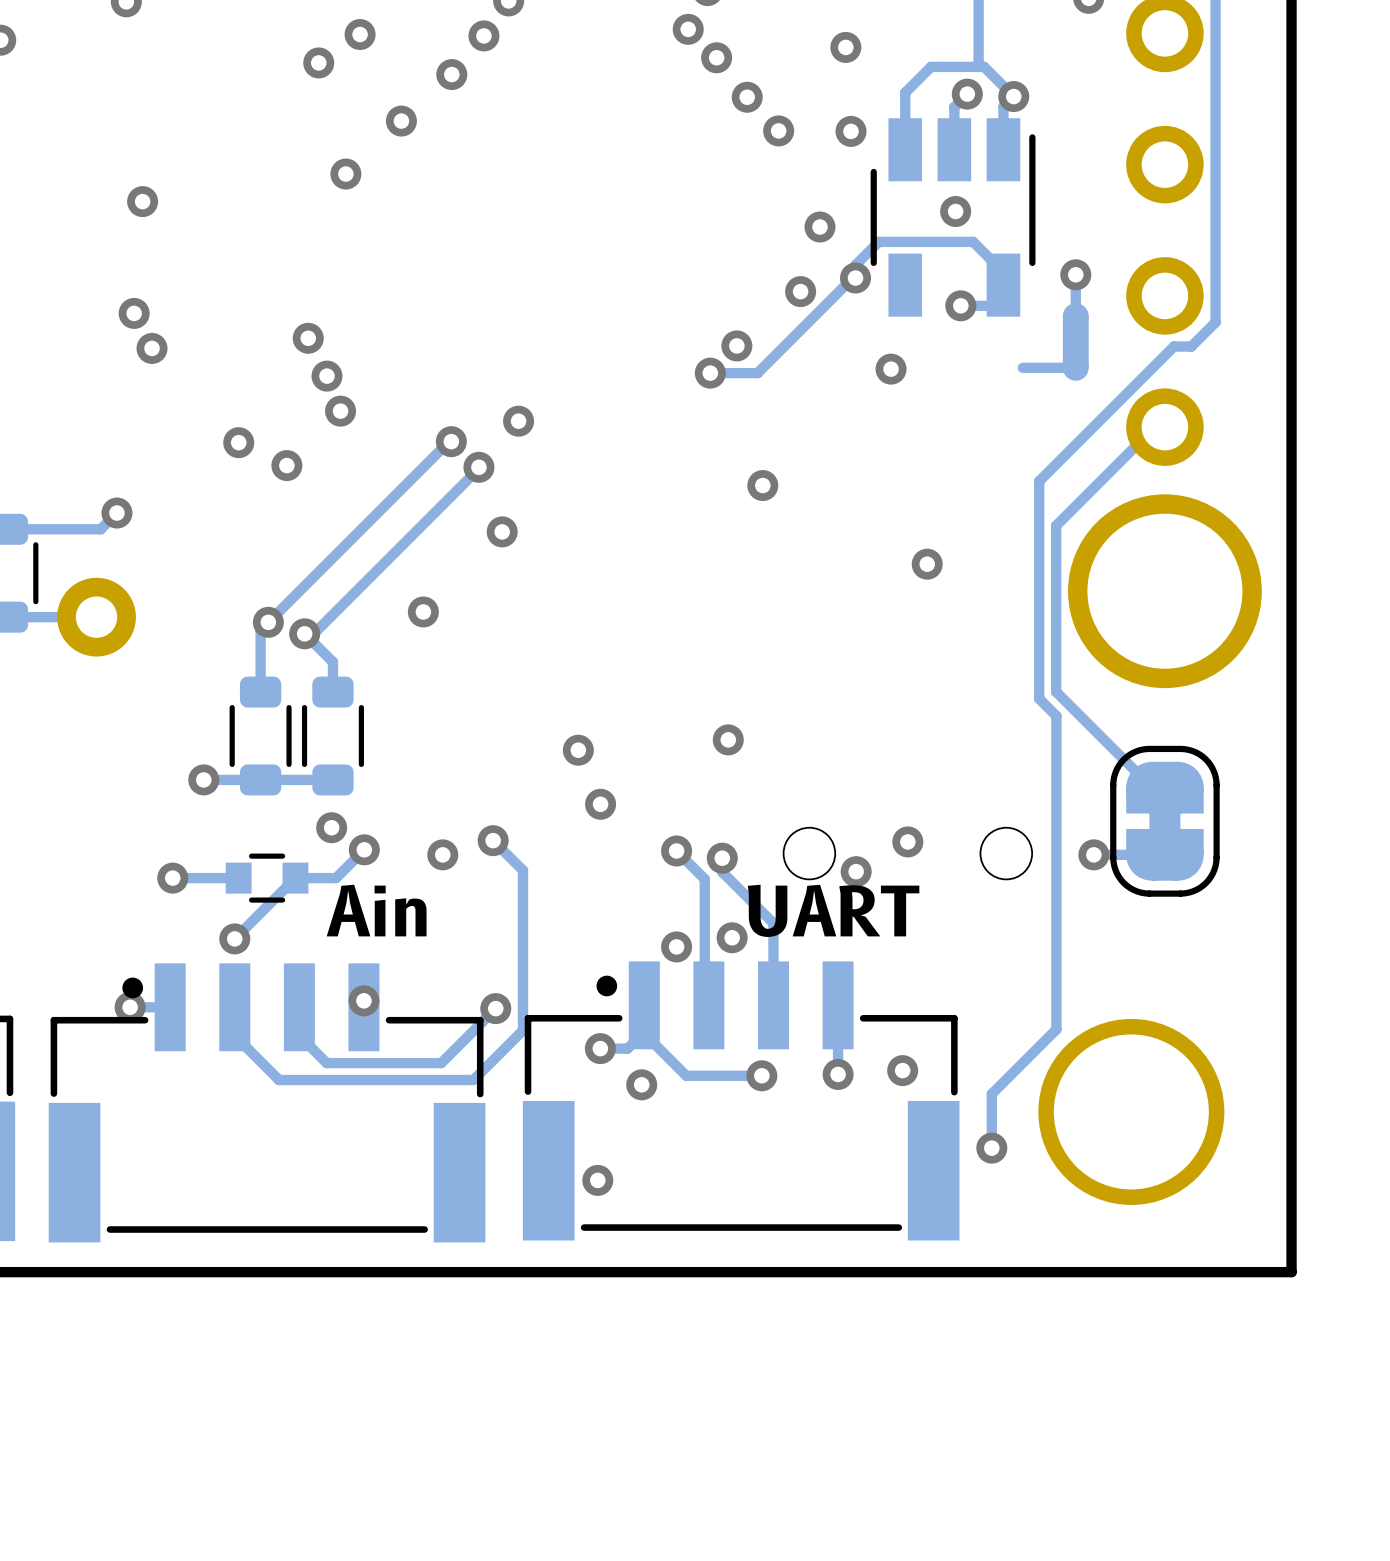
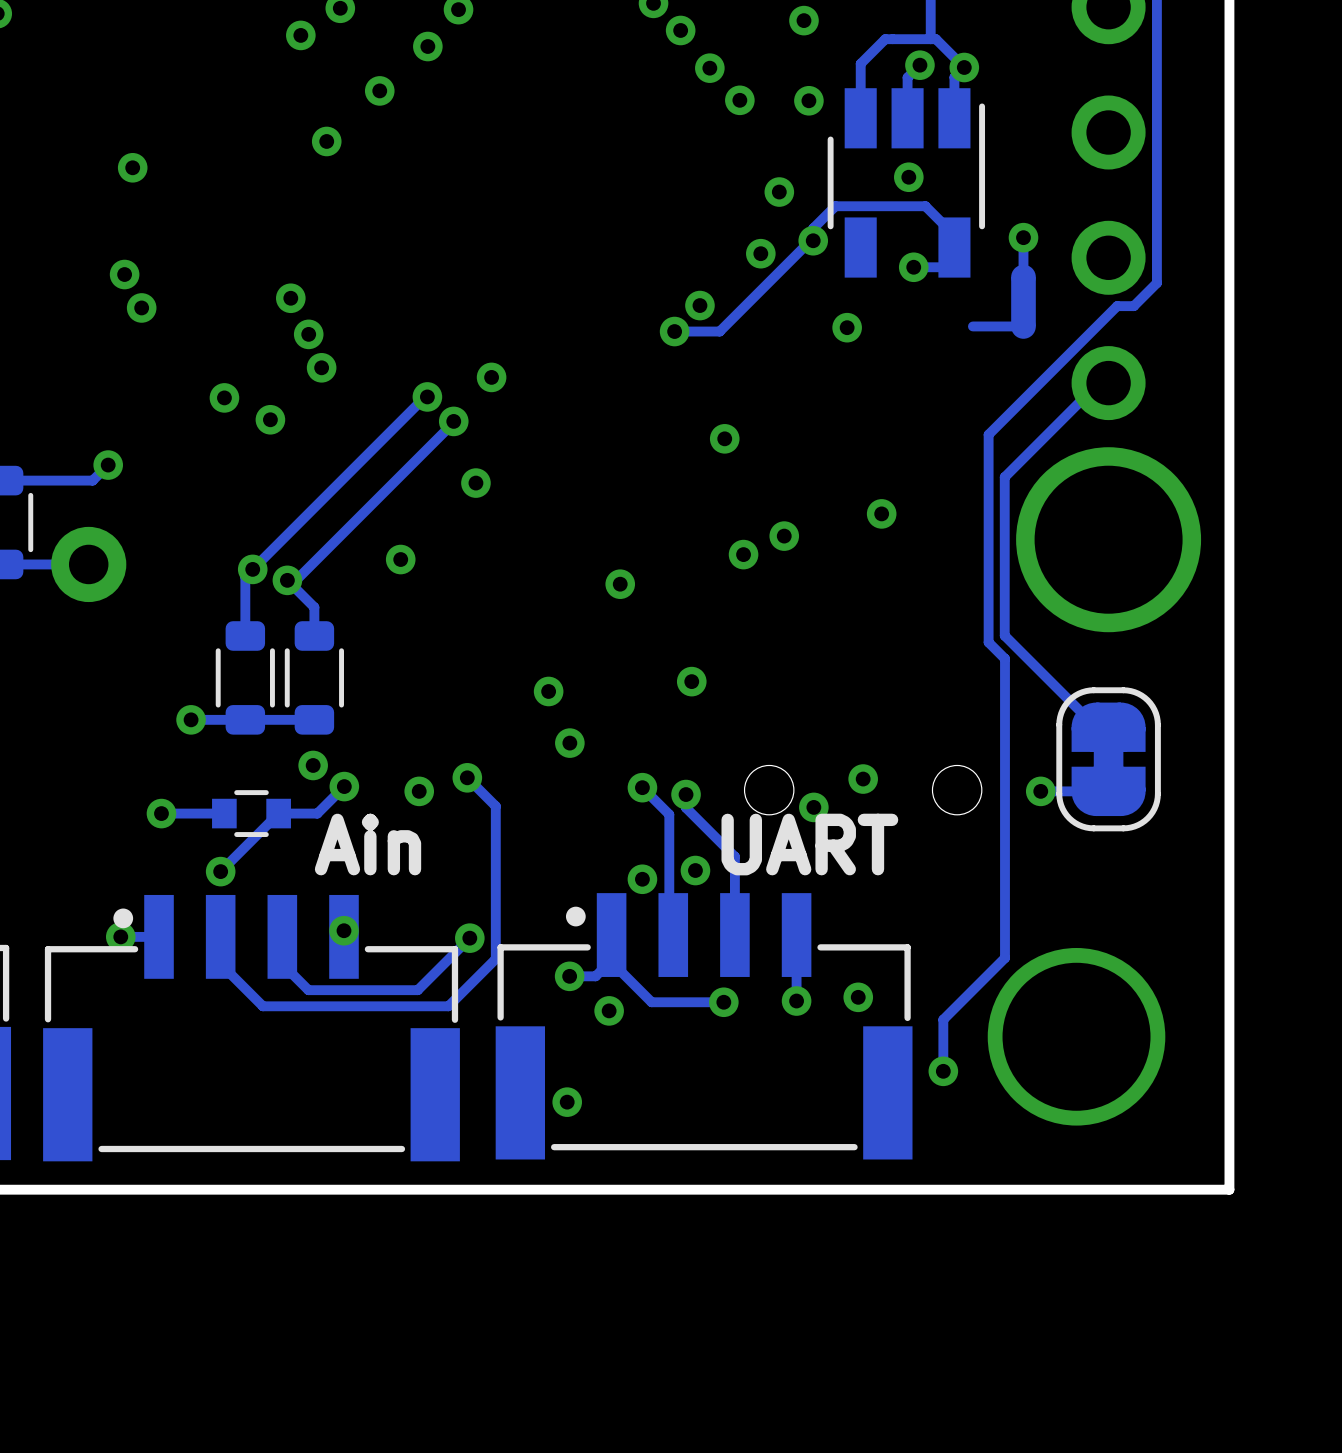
via: none -> (784, 536)
via: none -> (743, 554)
via: none -> (620, 584)

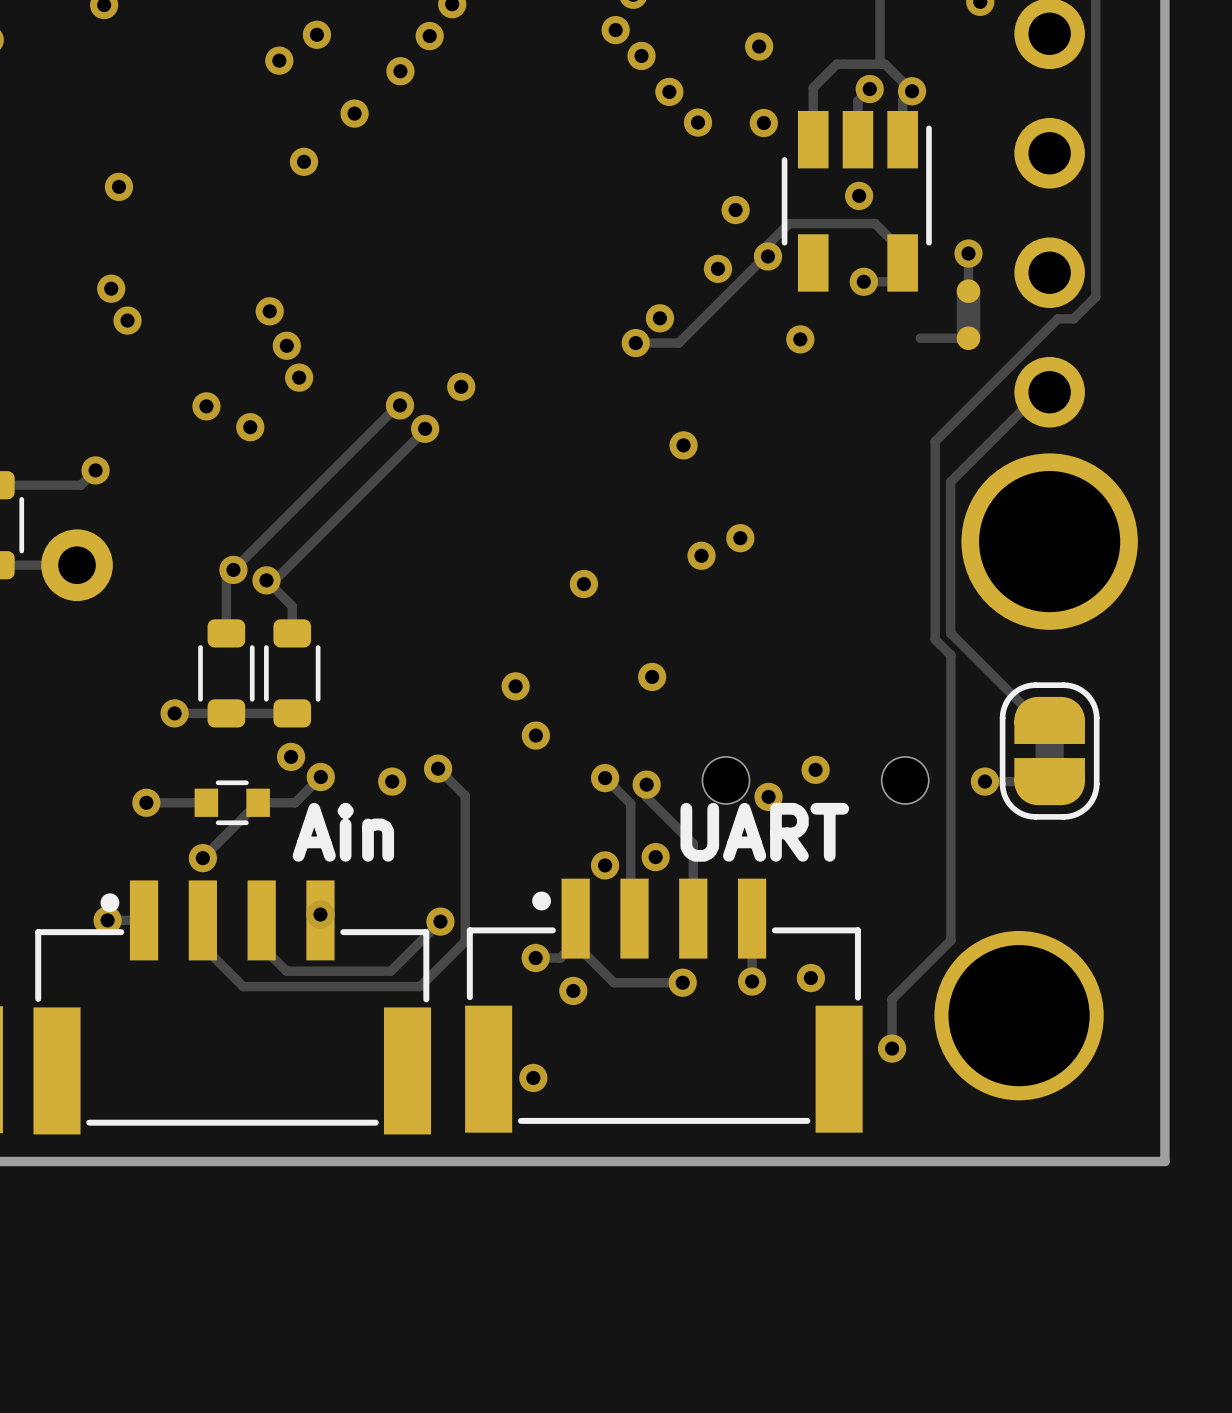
via: (475, 483) -> none
via: (881, 513) -> none
via: (400, 559) -> none

